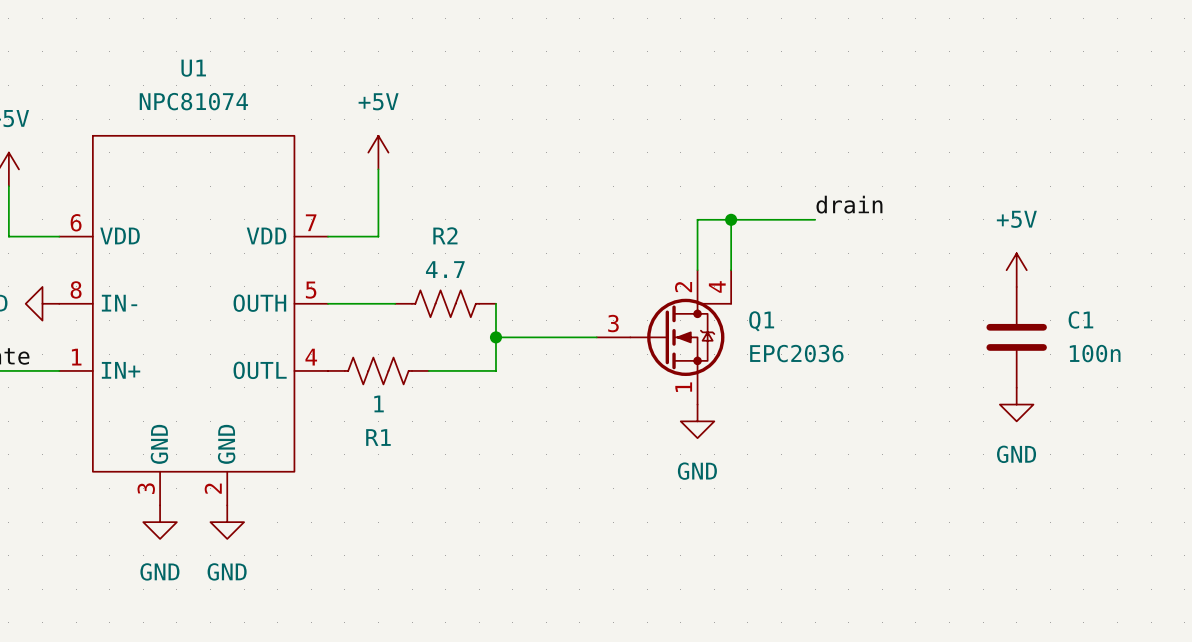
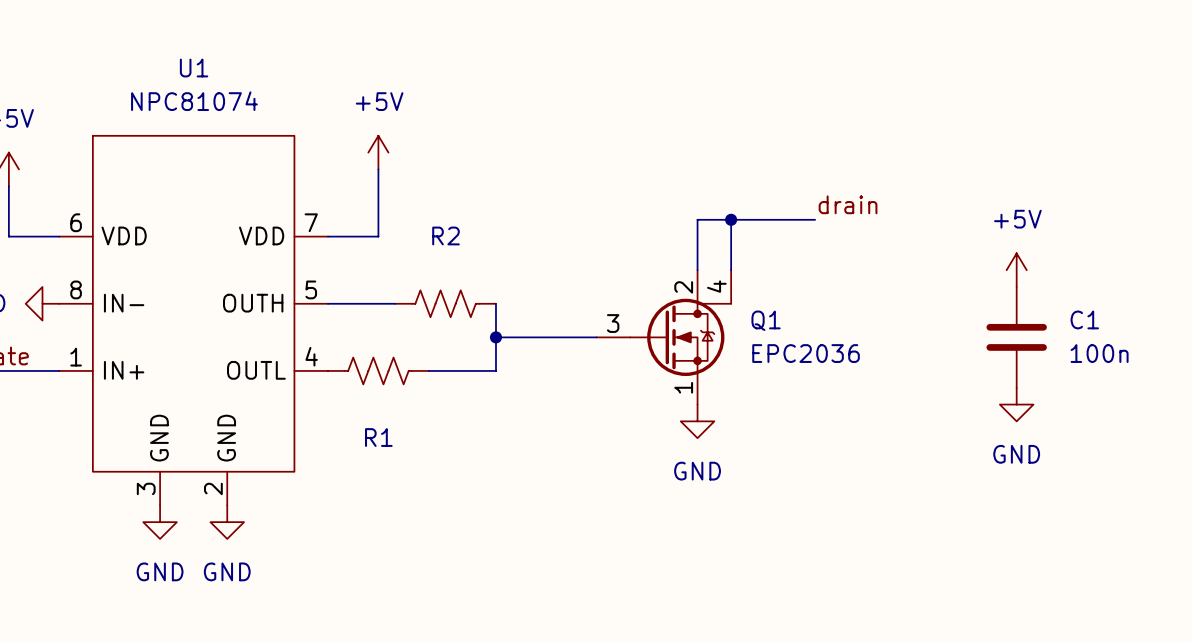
R2 value: 4.7 (445, 269) -> none
R1 value: 1 (379, 403) -> none

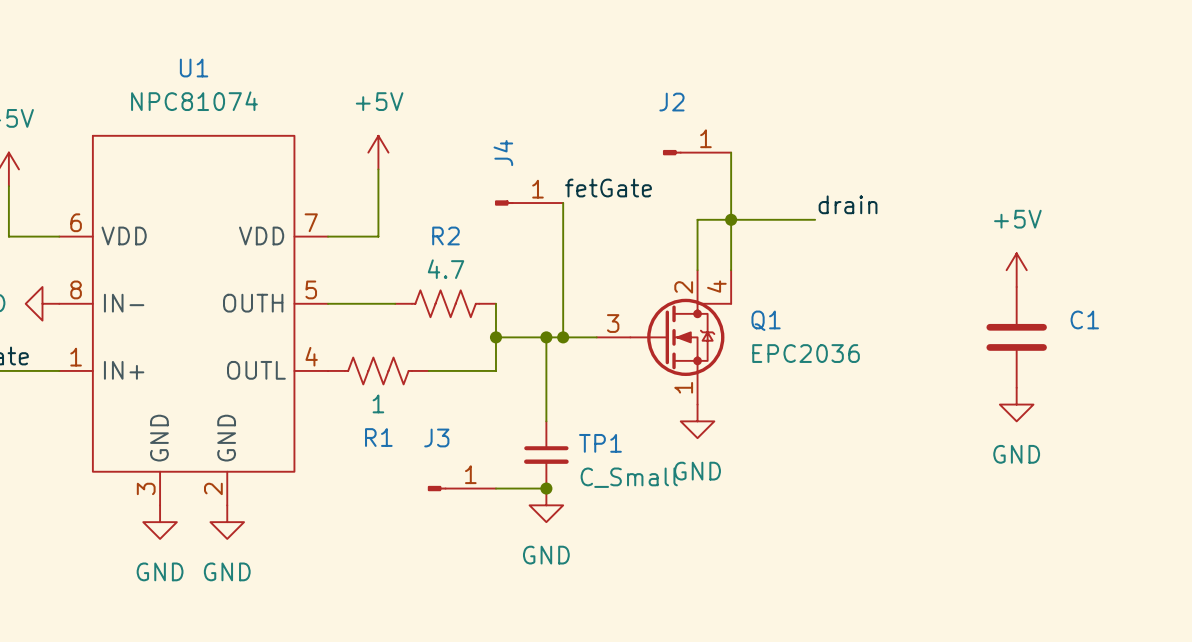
J2: none -> (697, 152)
wire: none -> (731, 152) (731, 219)
label: none -> fetGate (608, 188)
J4: none -> (529, 203)
wire: none -> (563, 203) (563, 337)
R2 value: none -> 4.7 (446, 269)
wire: none -> (546, 337) (546, 421)
junction: none -> (546, 337)
junction: none -> (563, 337)
C1 value: 100n (1099, 353) -> none
R1 value: none -> 1 (378, 403)
TP1: none -> C_Small (546, 454)
J3: none -> (461, 488)
wire: none -> (495, 488) (546, 488)
junction: none -> (546, 488)
power symbol: none -> GND (546, 505)

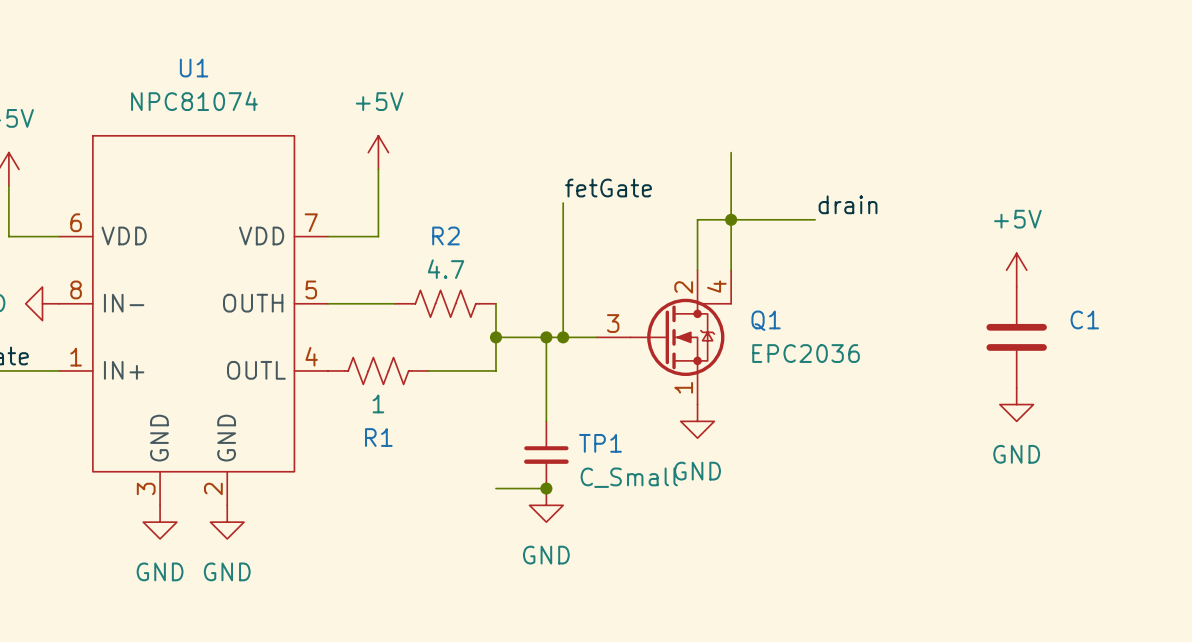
J2: (697, 152) -> none
J4: (529, 203) -> none
J3: (461, 488) -> none

